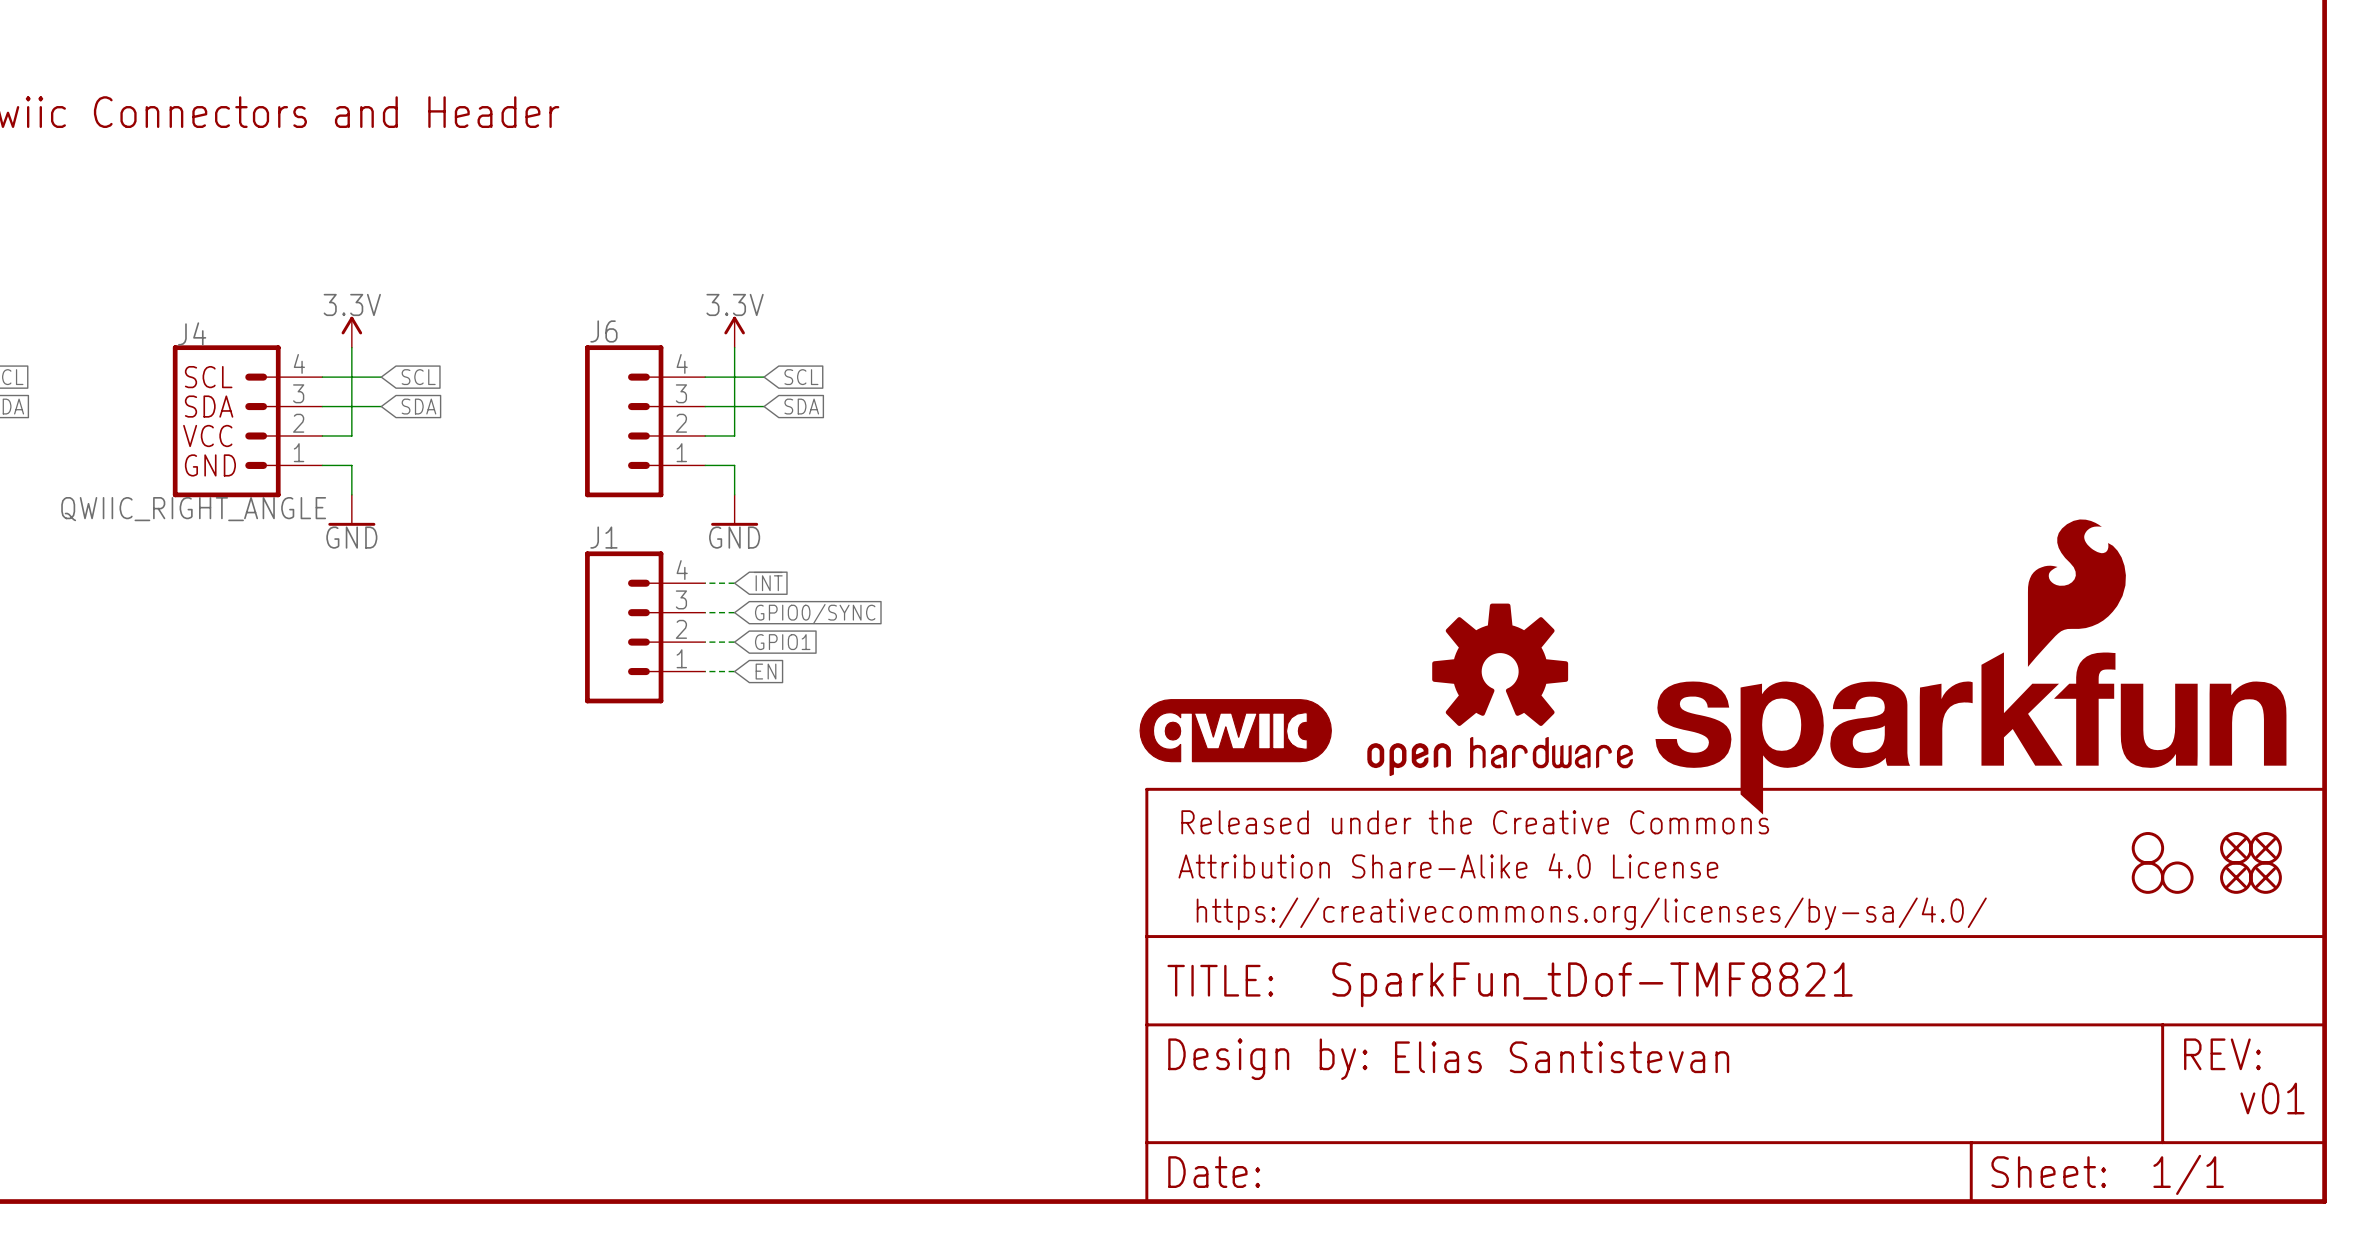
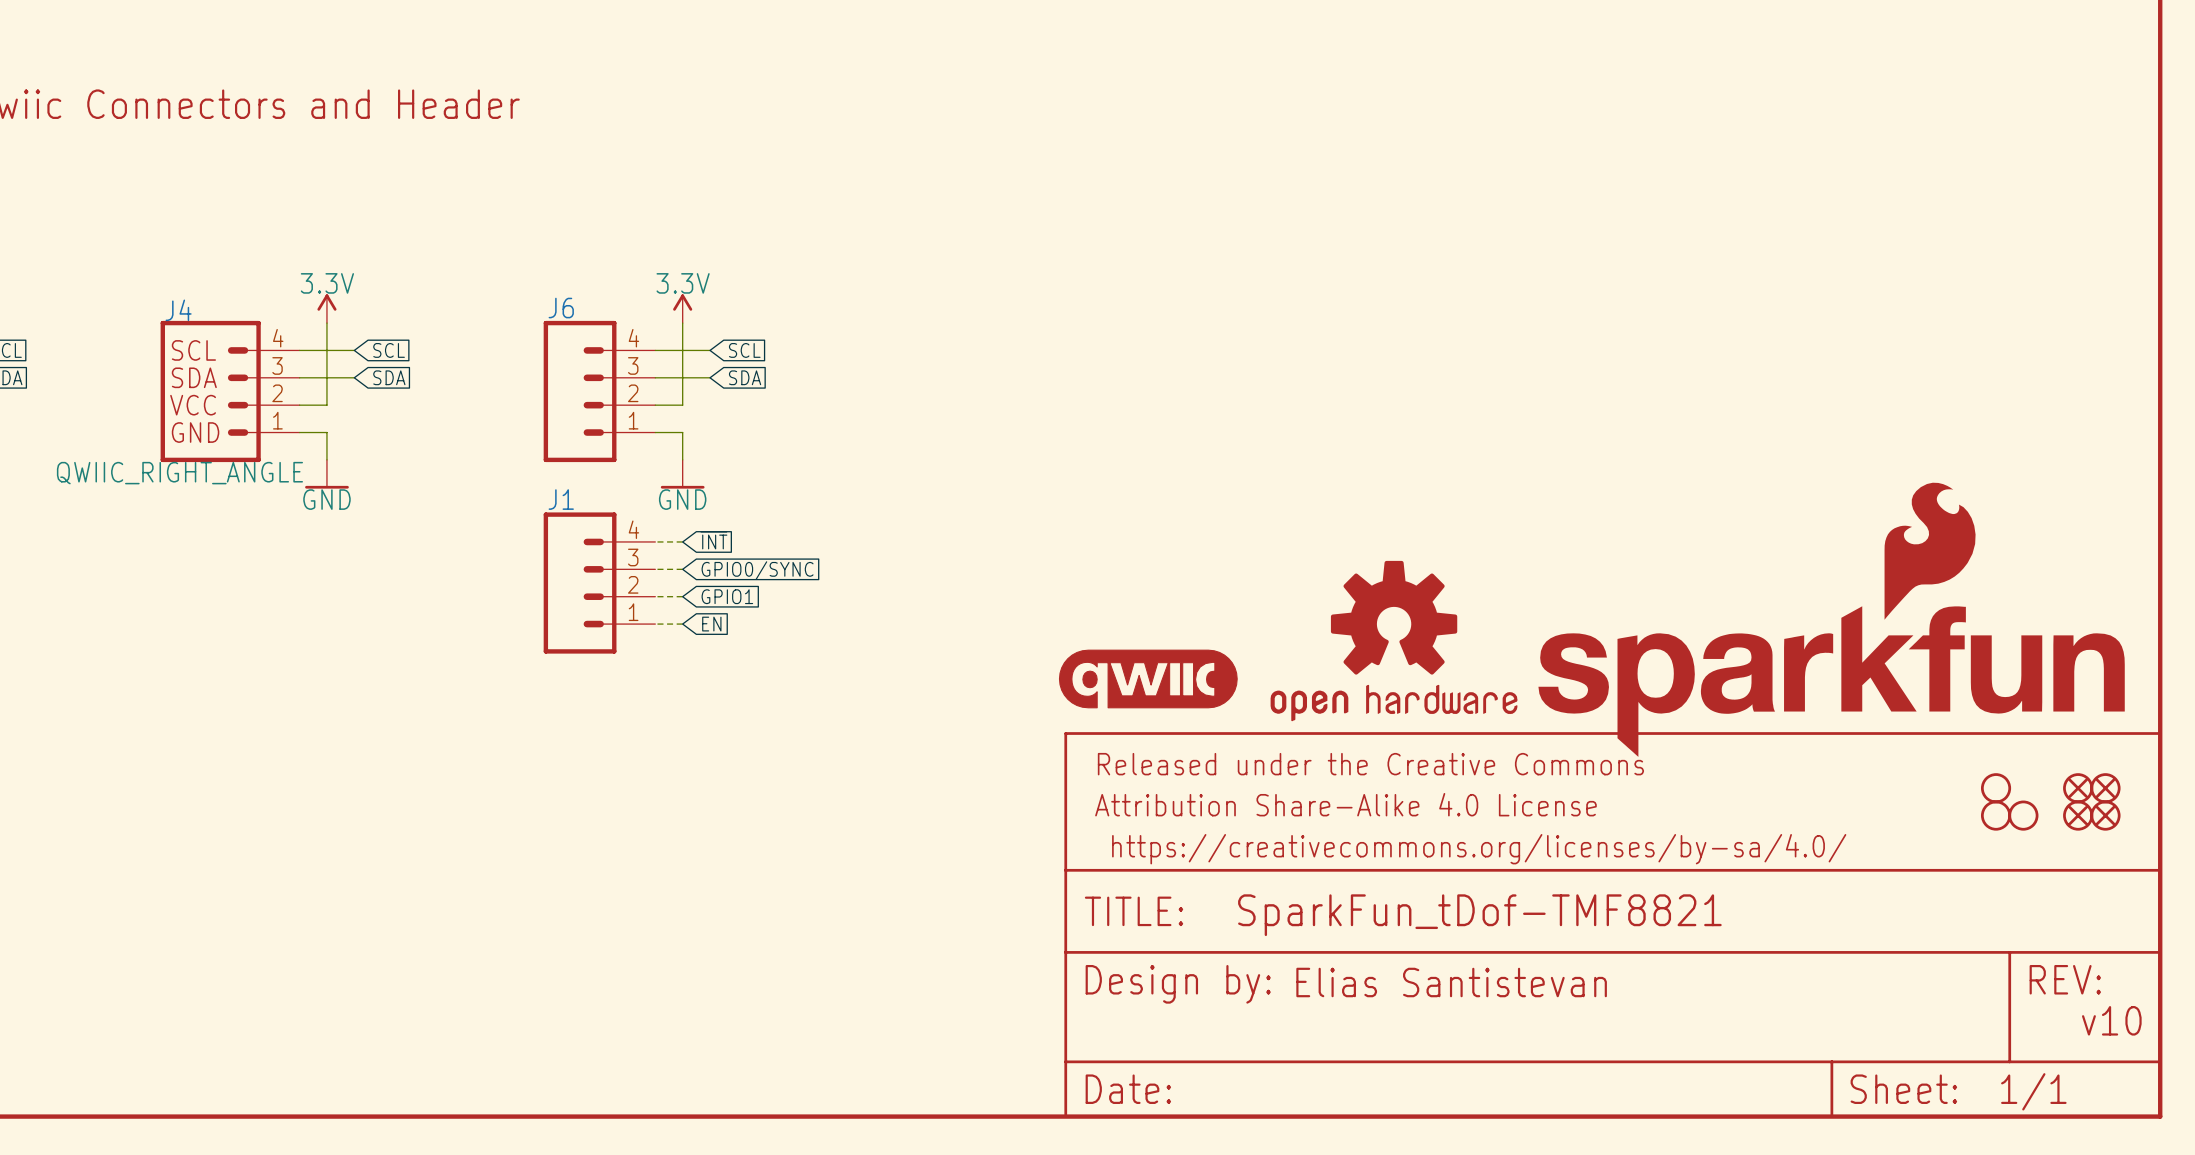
text: v01 (2272, 1098) -> v10 (2111, 1020)

